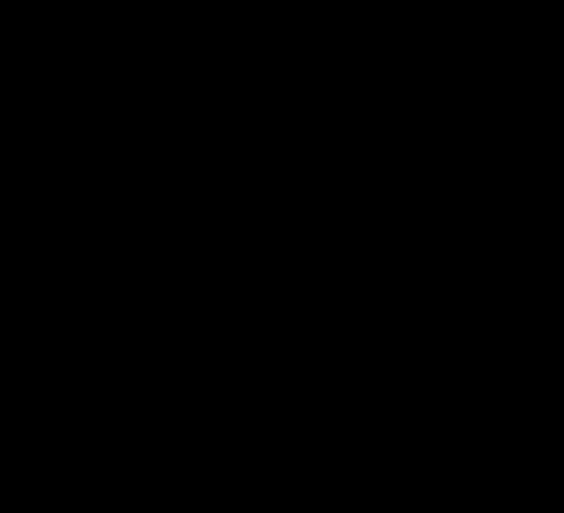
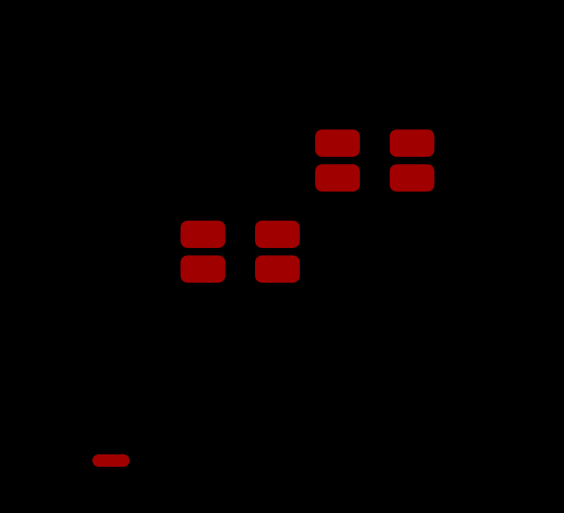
part: none -> (374, 160)
part: none -> (240, 251)
part: none -> (111, 460)

